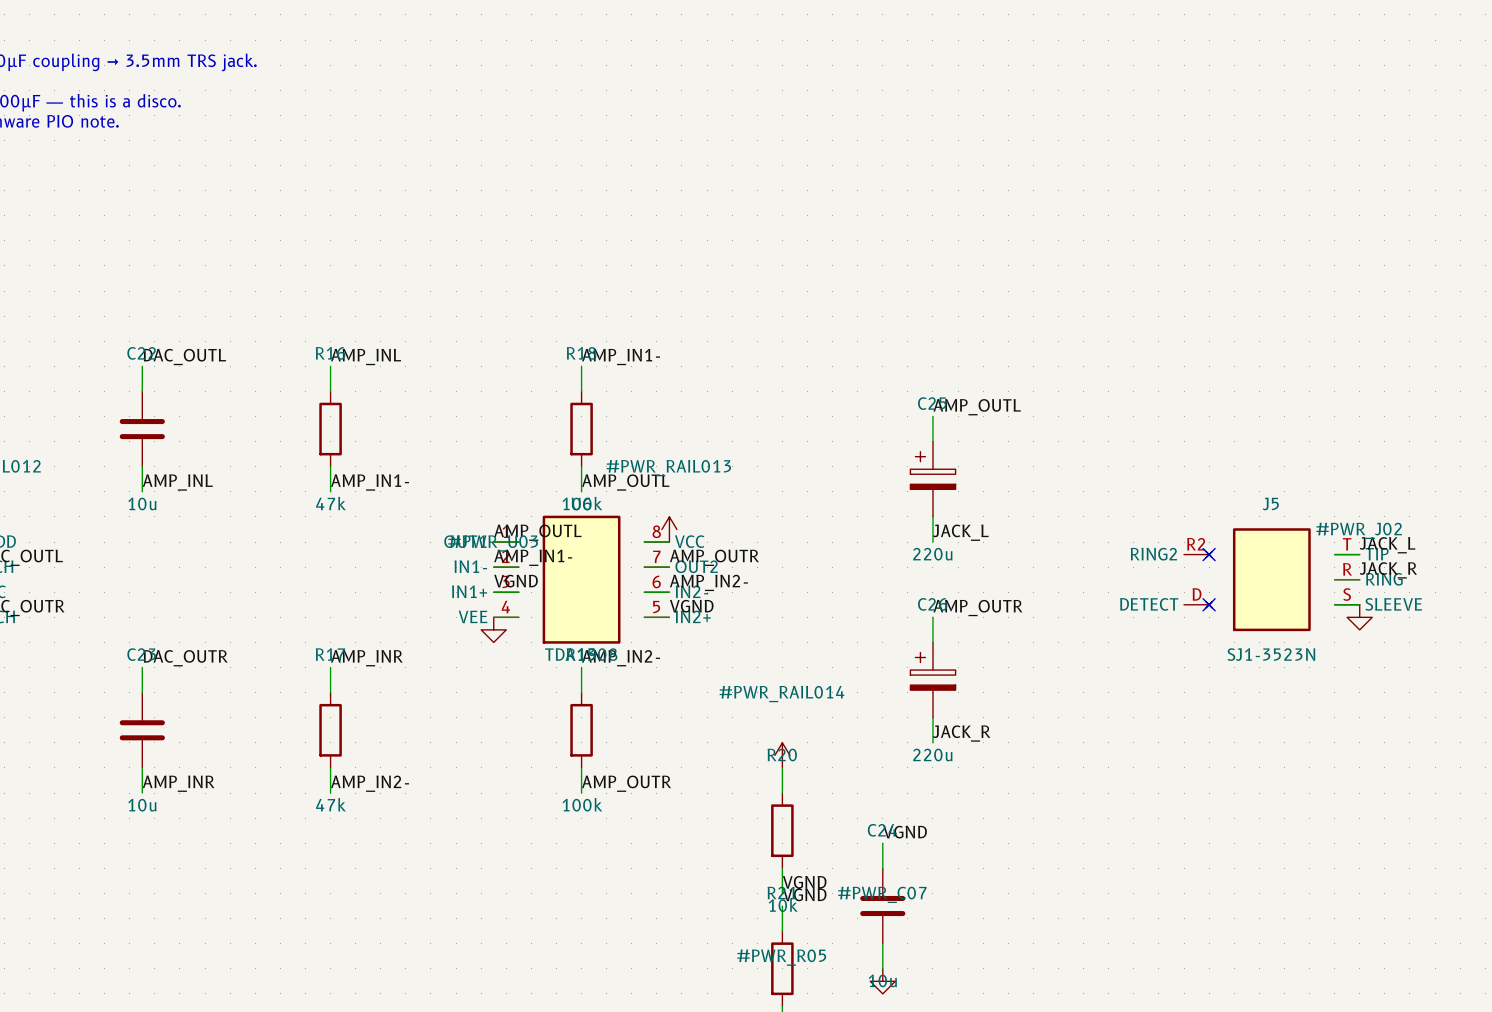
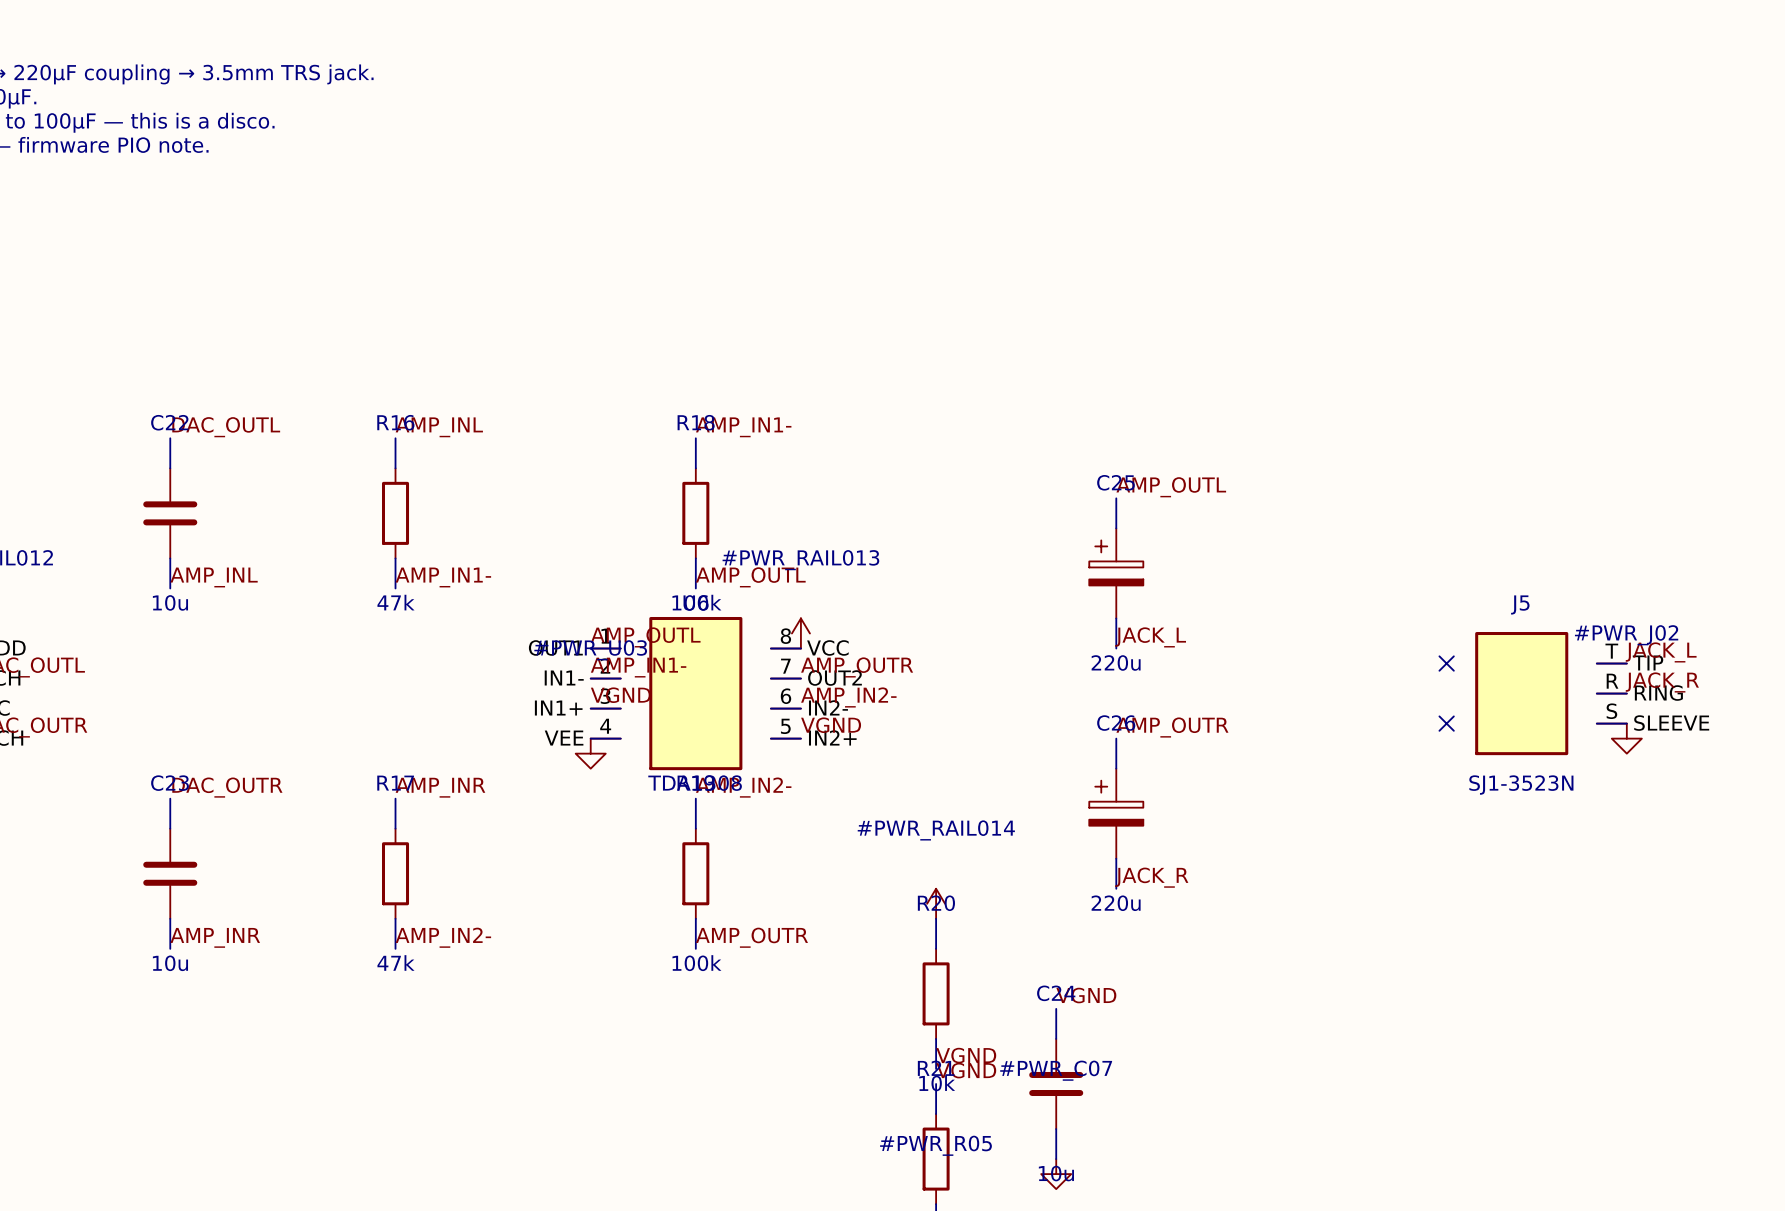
J5 symbol: [1184, 528, 1360, 632] -> [1475, 632, 1627, 756]

